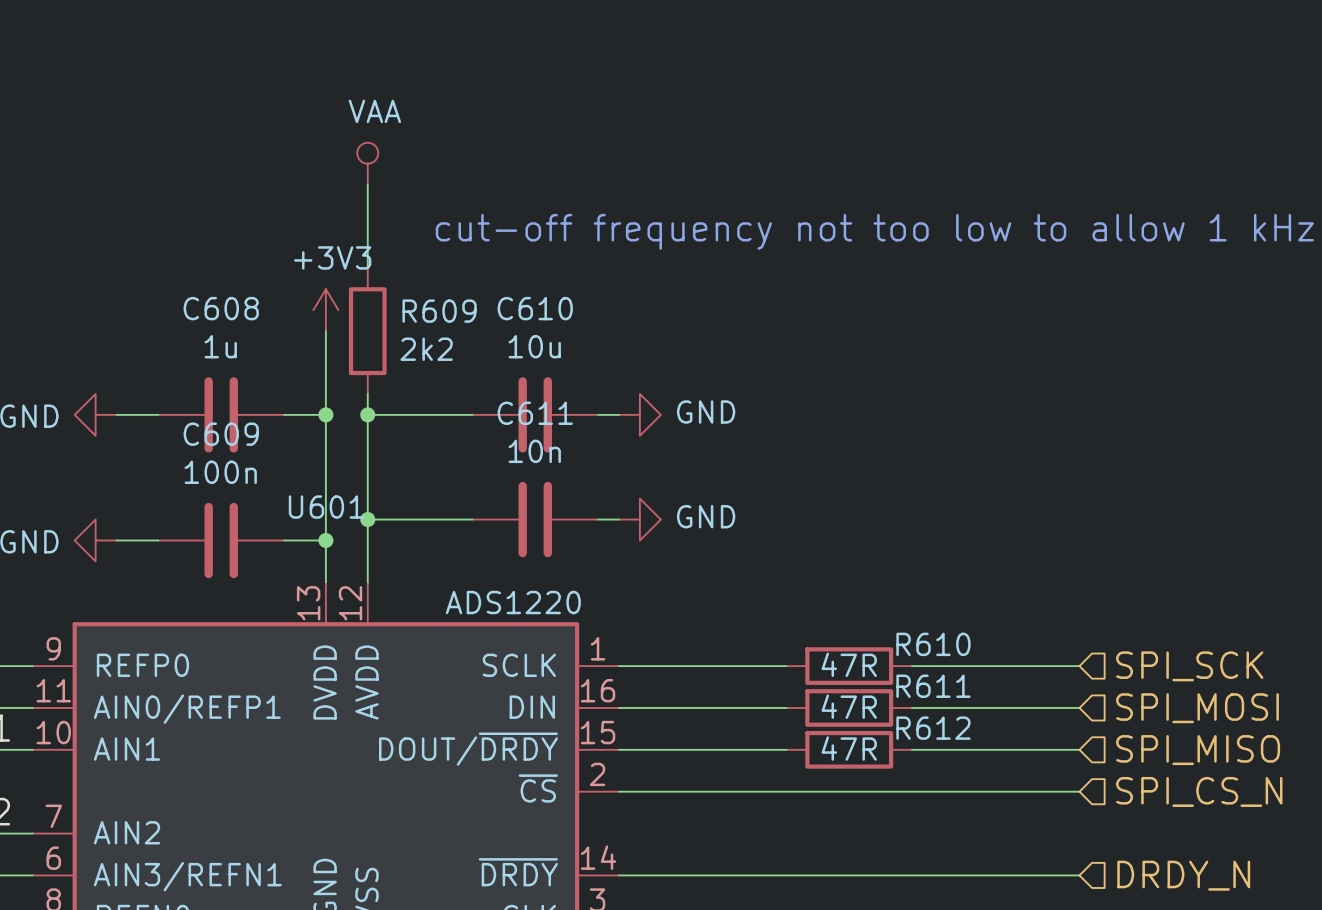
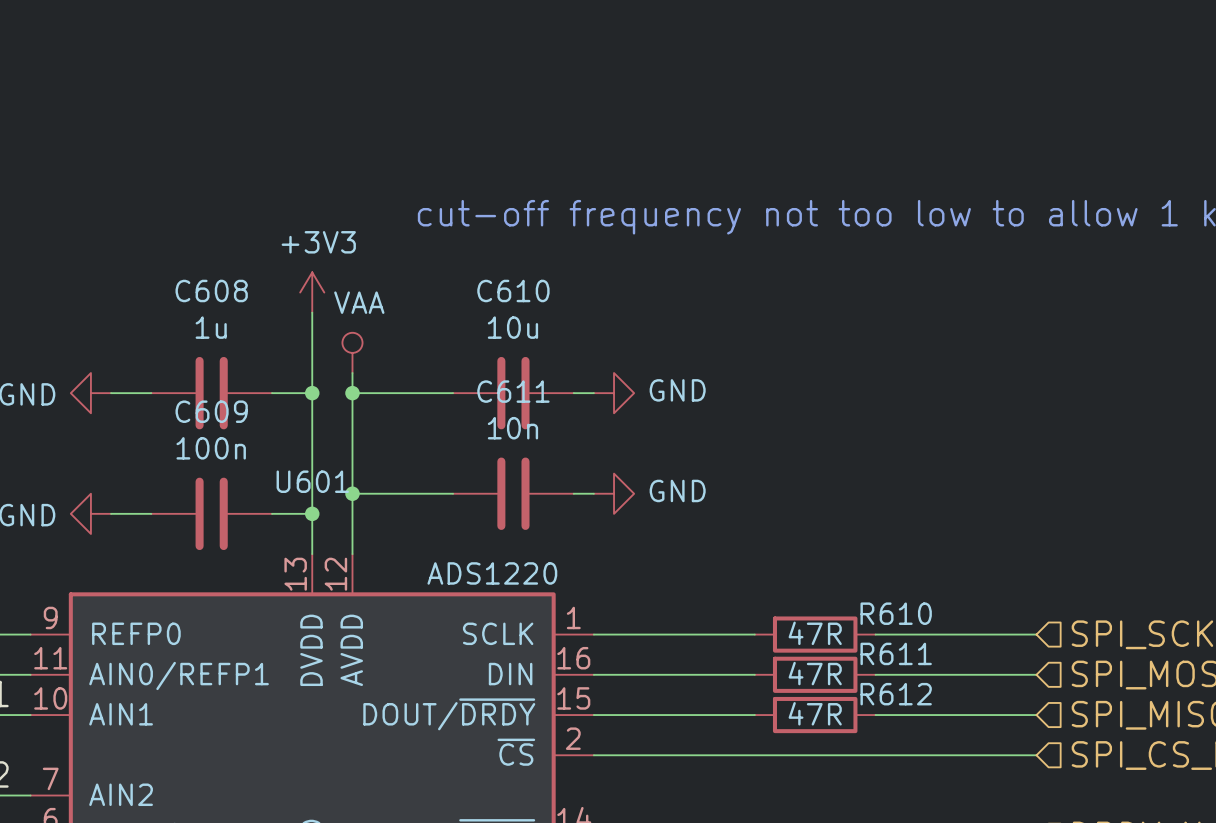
power symbol position: VAA (367, 163) -> VAA (352, 352)
wire: (367, 184) (367, 268) -> none
R609: 2k2 (367, 331) -> none

